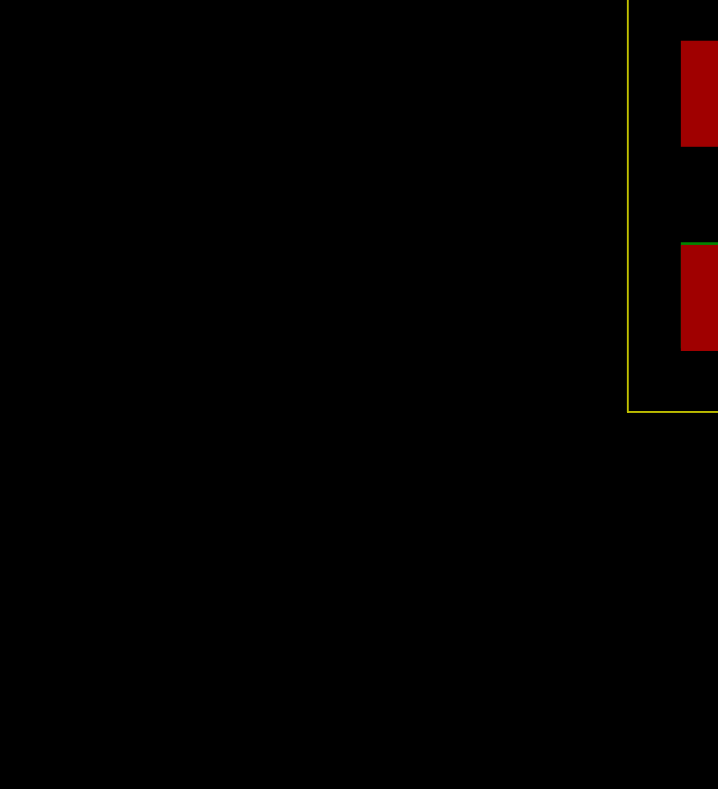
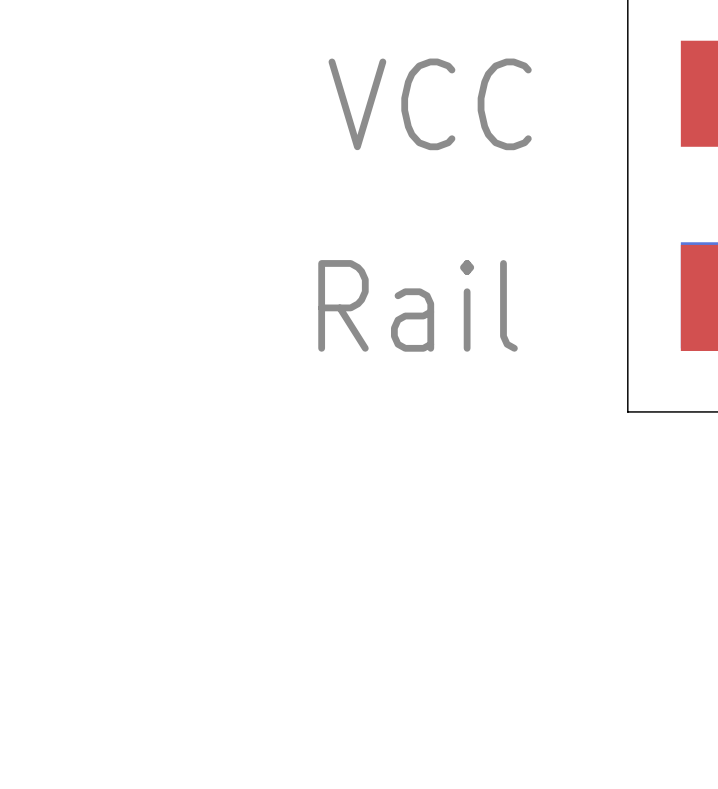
text: none -> VCC (430, 104)
text: none -> Rail (418, 305)

